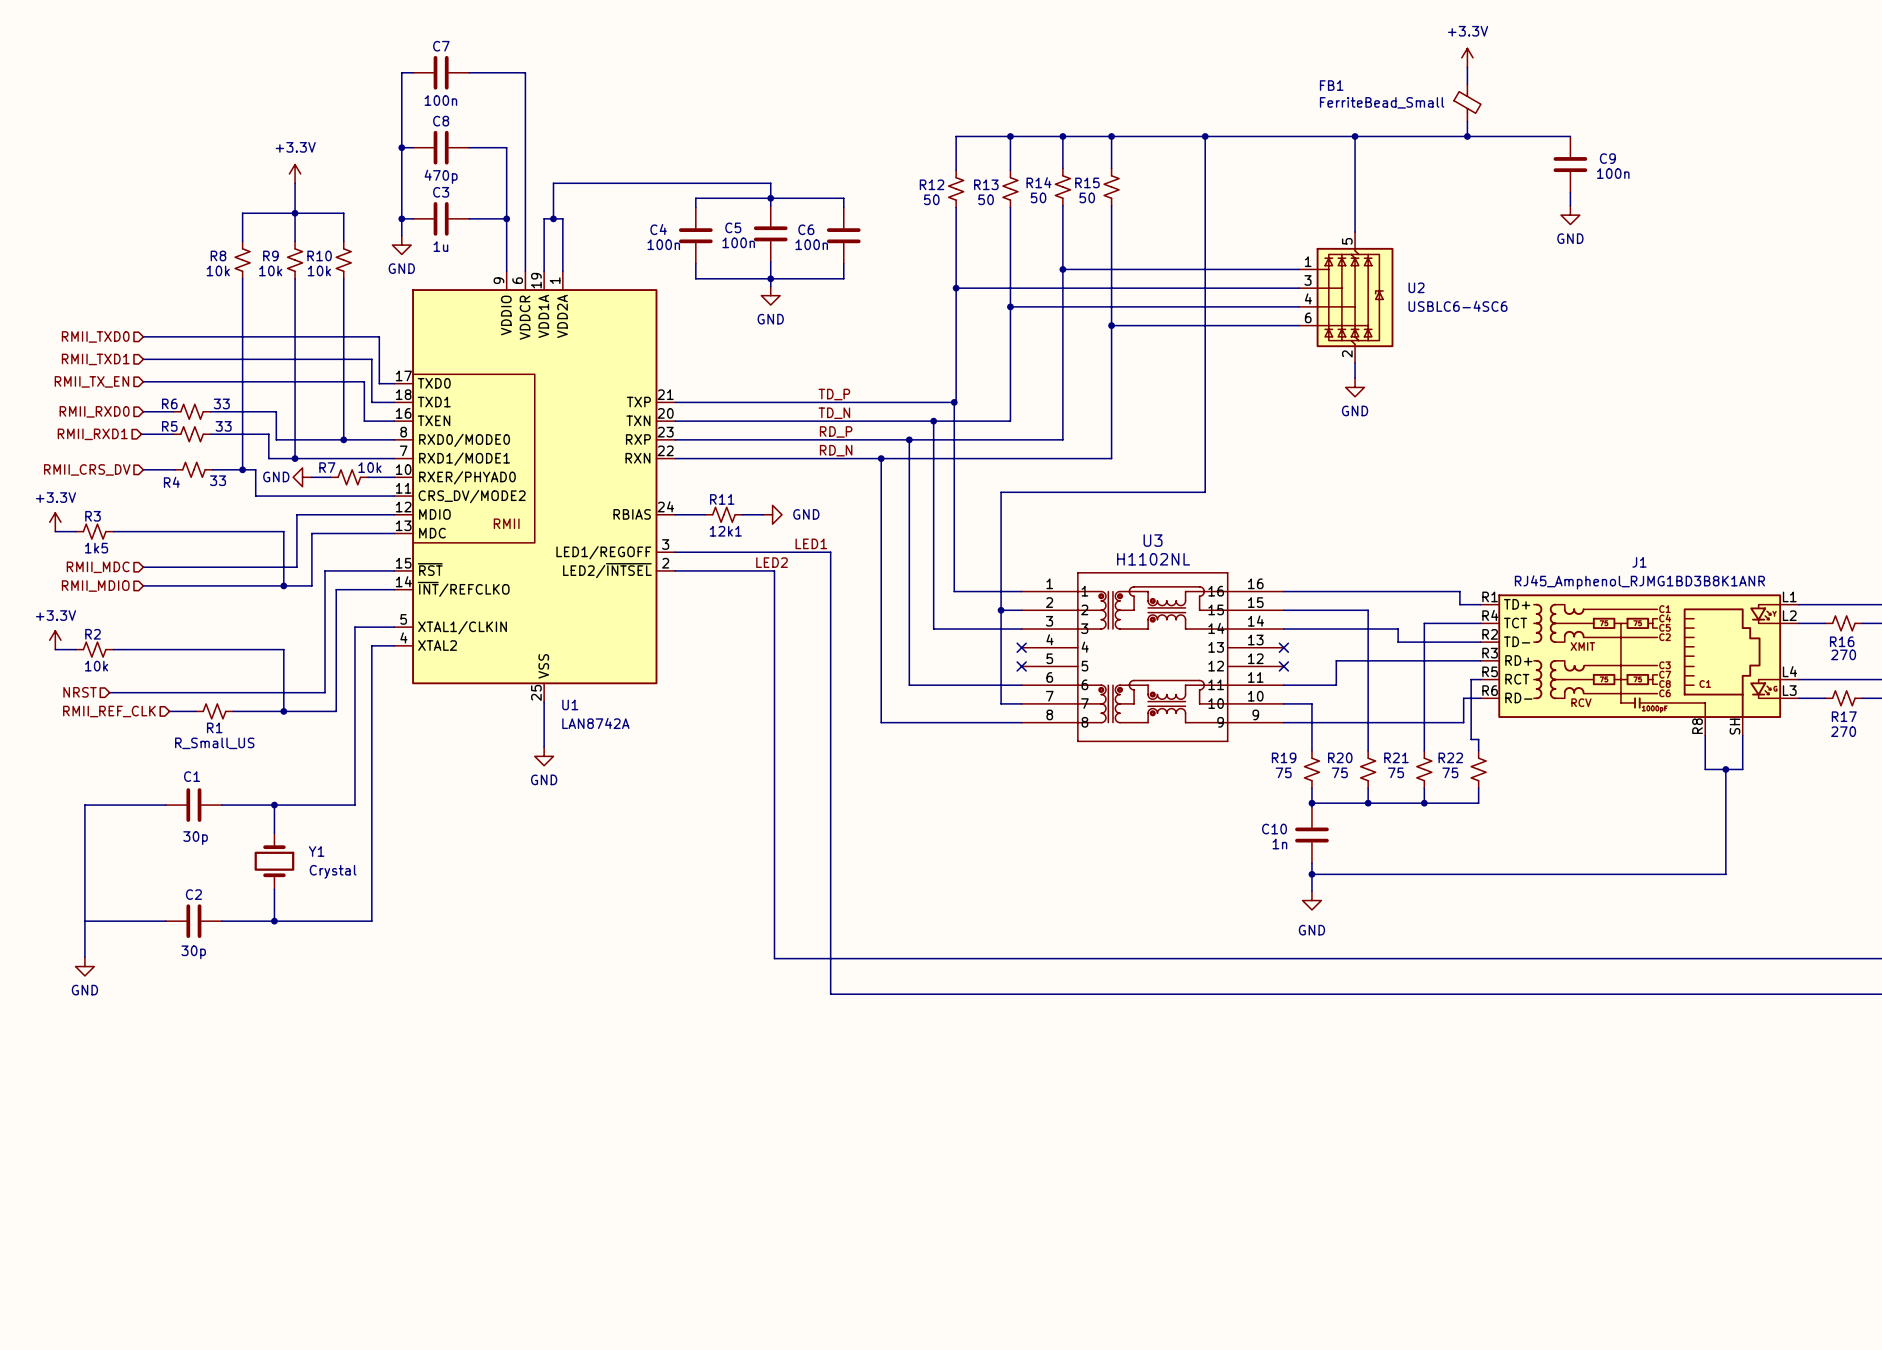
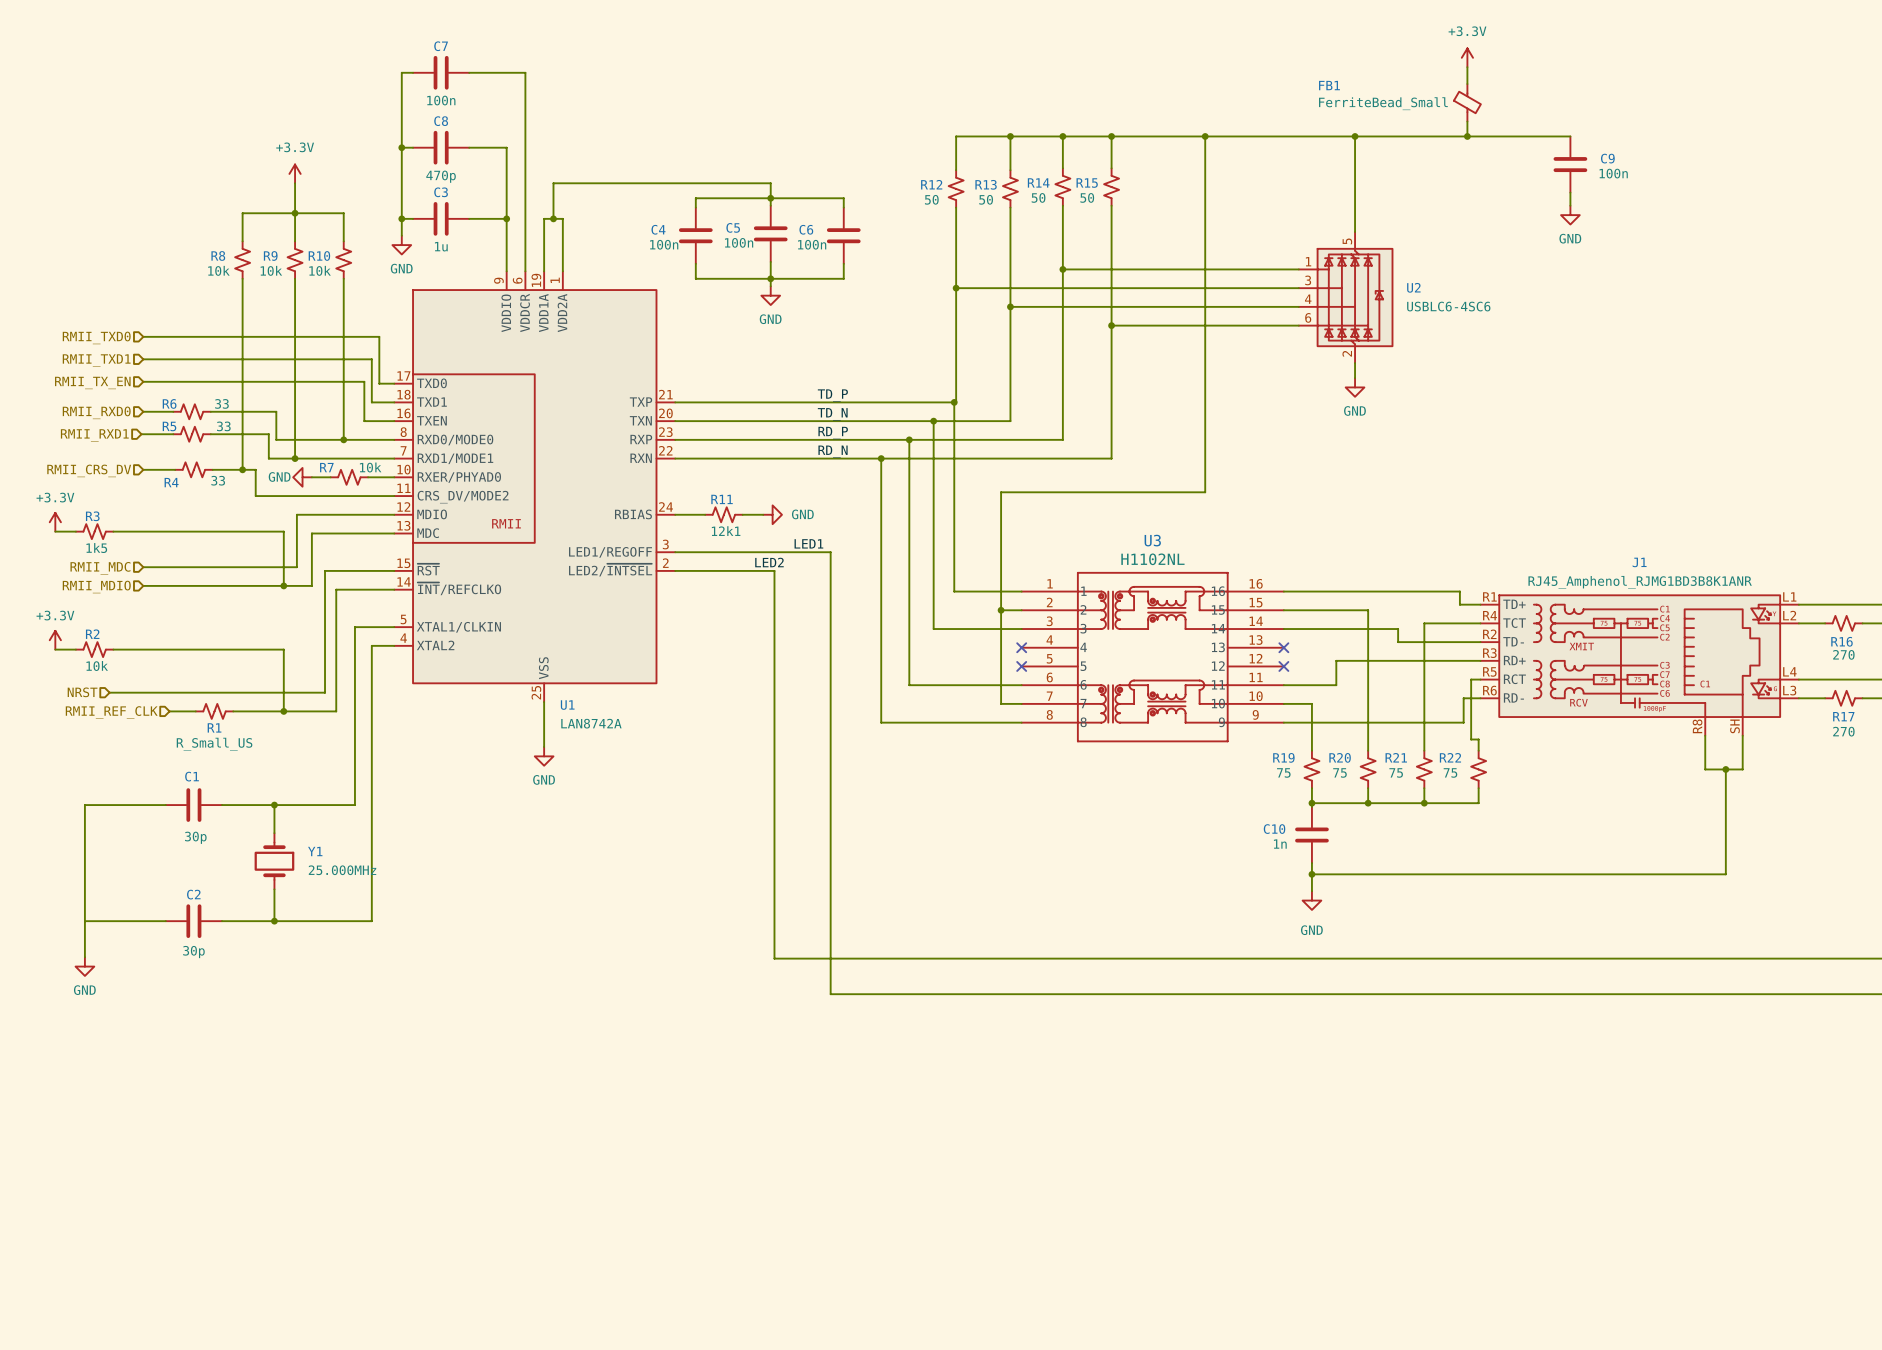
Y1 value: Crystal (333, 871) -> 25.000MHz (342, 870)

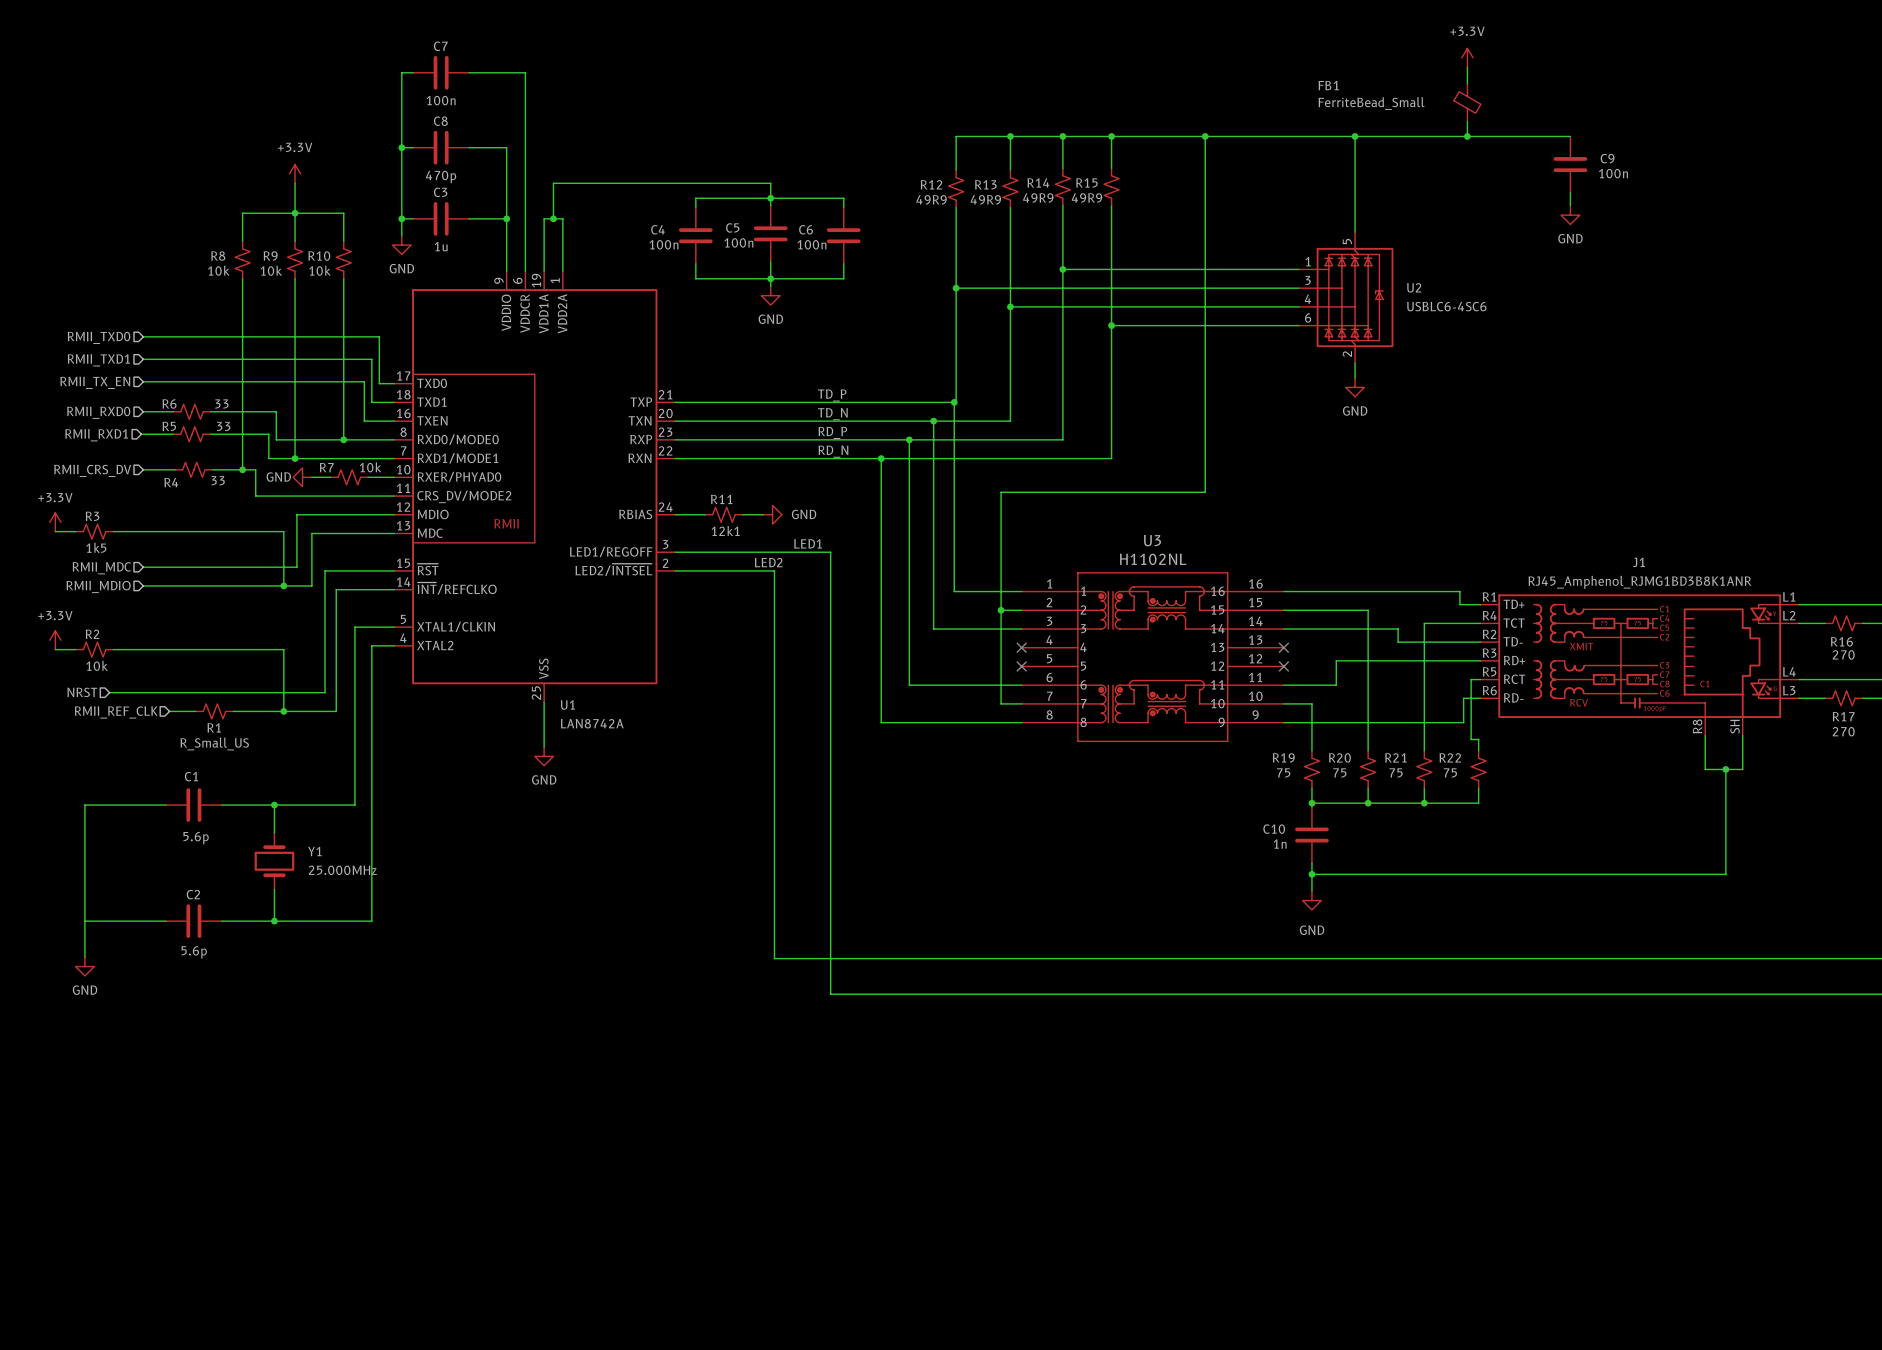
R14 value: 50 (1038, 197) -> 49R9 (1038, 197)
R15 value: 50 (1087, 197) -> 49R9 (1086, 197)
R12 value: 50 (931, 199) -> 49R9 (931, 199)
R13 value: 50 (986, 199) -> 49R9 (985, 199)
C1 value: 30p (195, 837) -> 5.6p (196, 838)
C2 value: 30p (193, 952) -> 5.6p (194, 952)

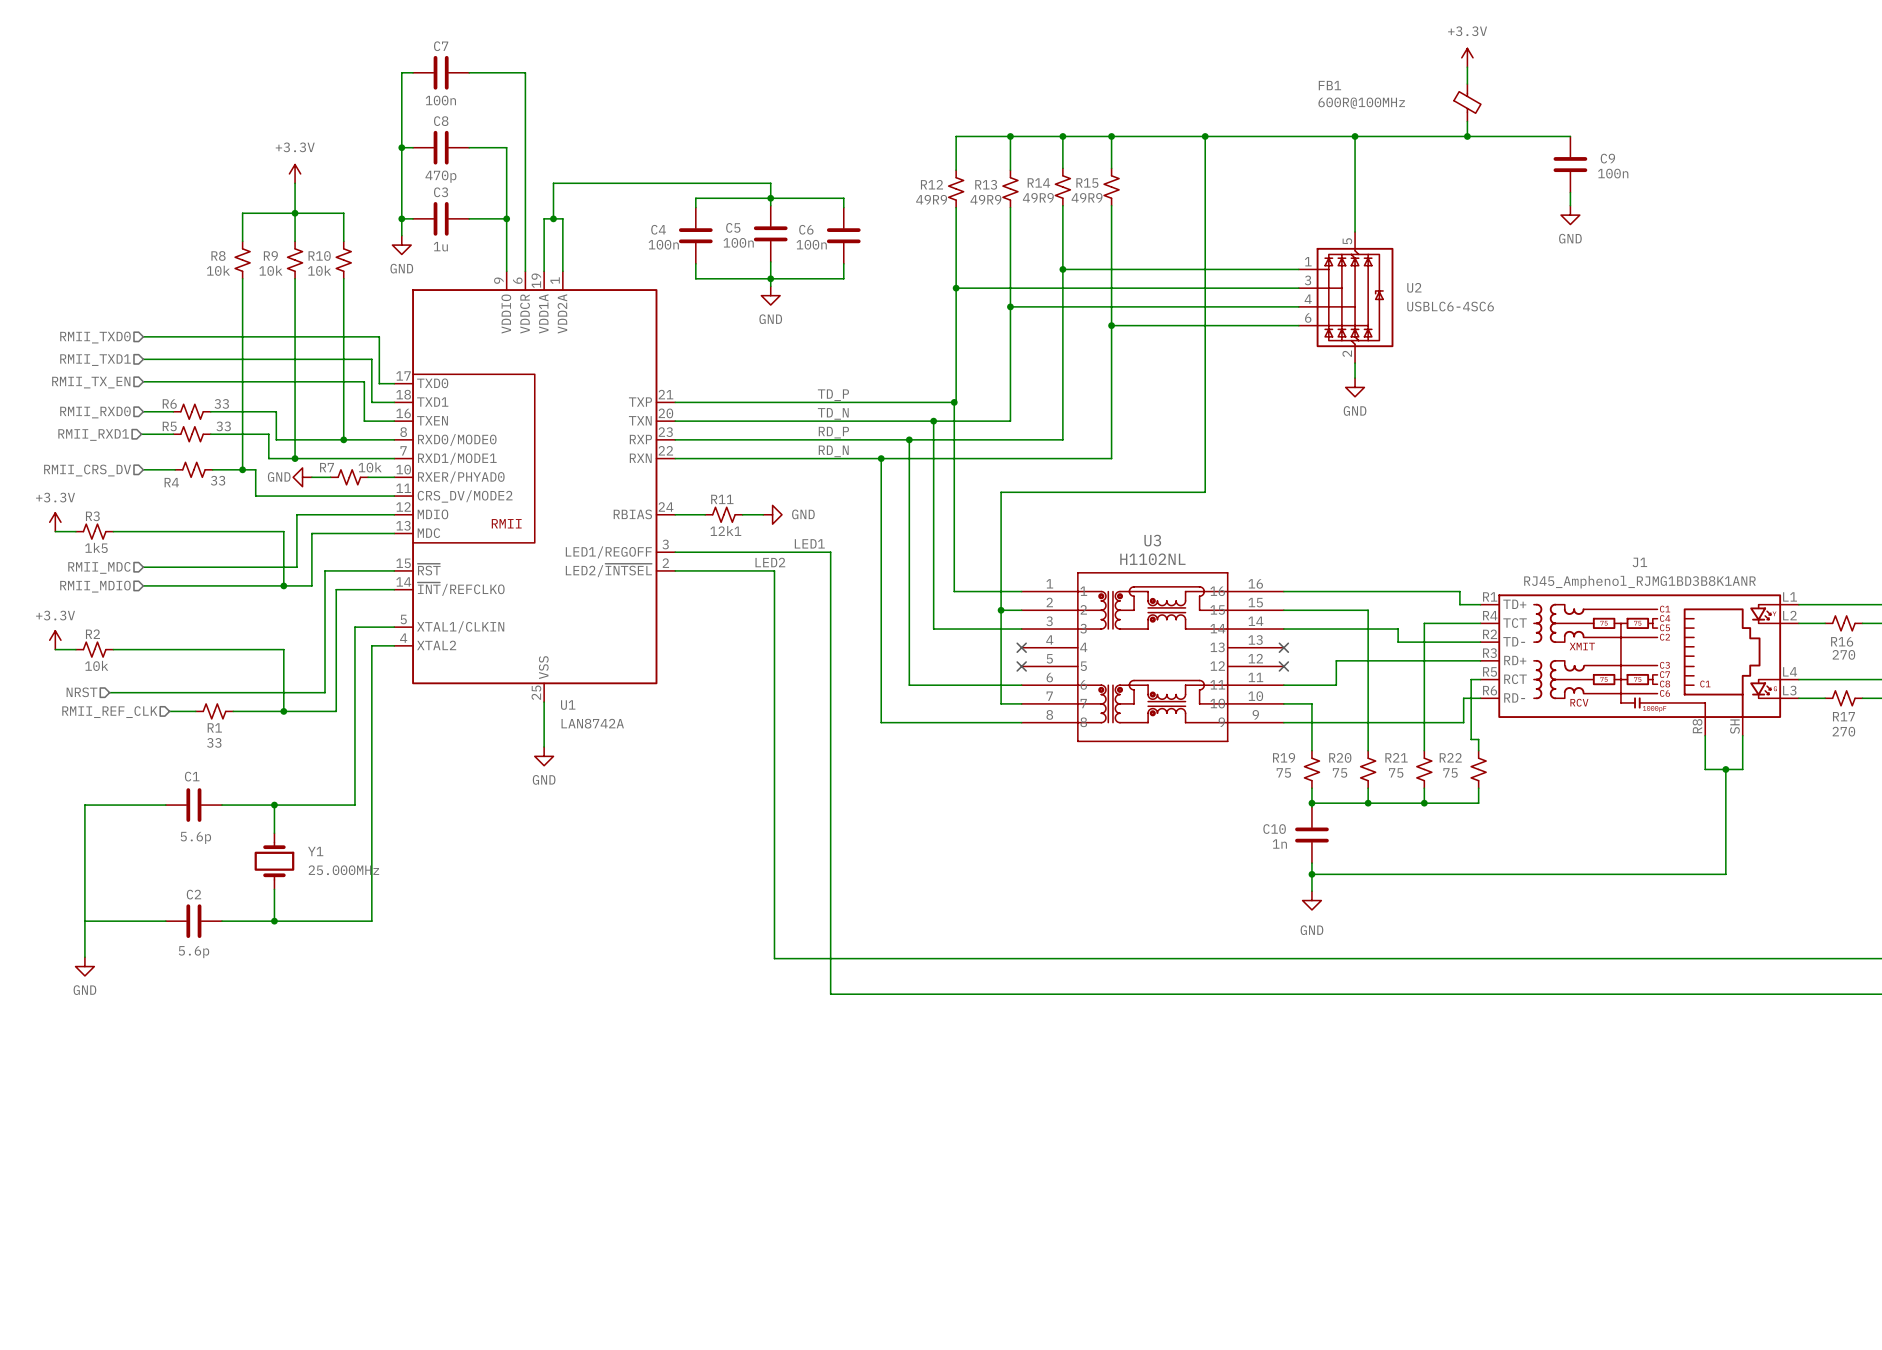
FB1 value: FerriteBead_Small (1371, 103) -> 600R@100MHz (1361, 103)
R1 value: R_Small_US (214, 743) -> 33 (214, 742)

